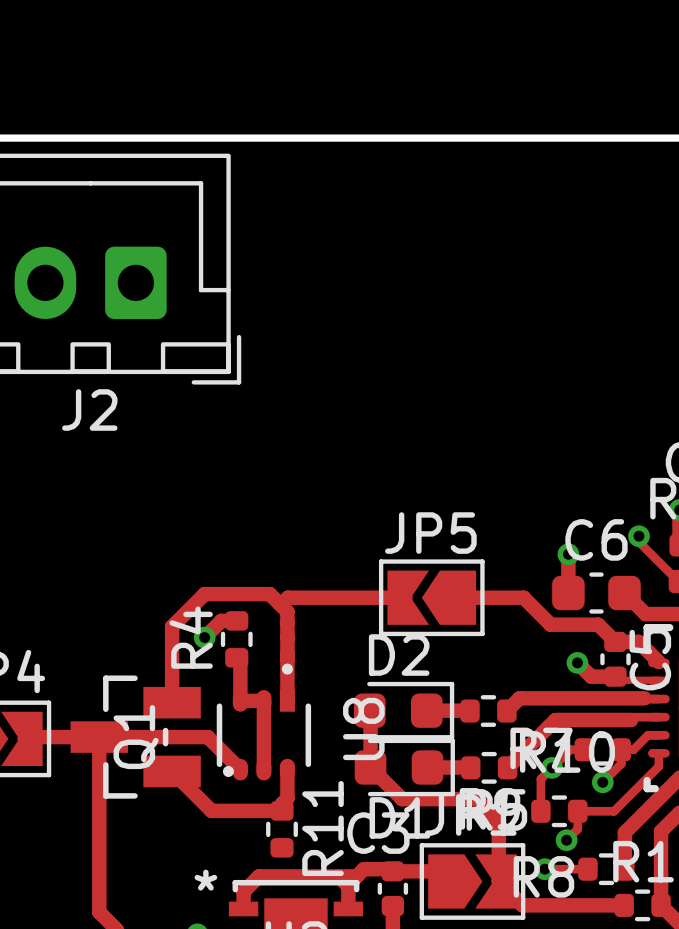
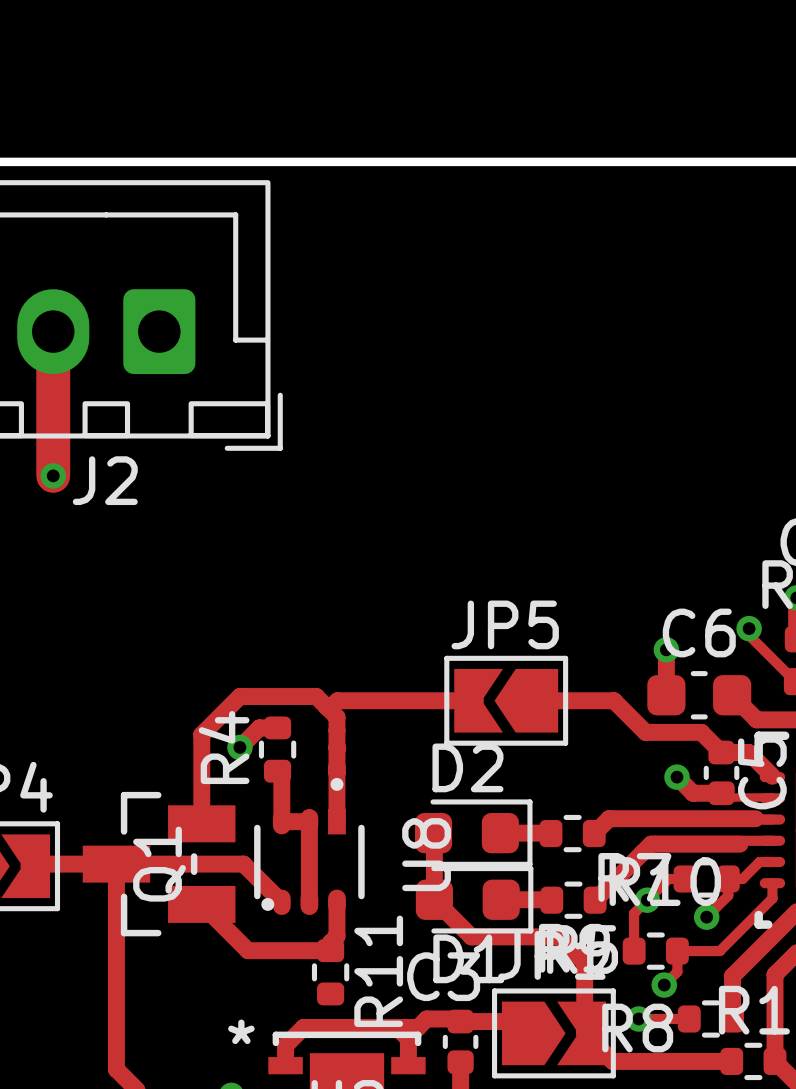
track: none -> (53, 331) (53, 475)
via: none -> (53, 475)

